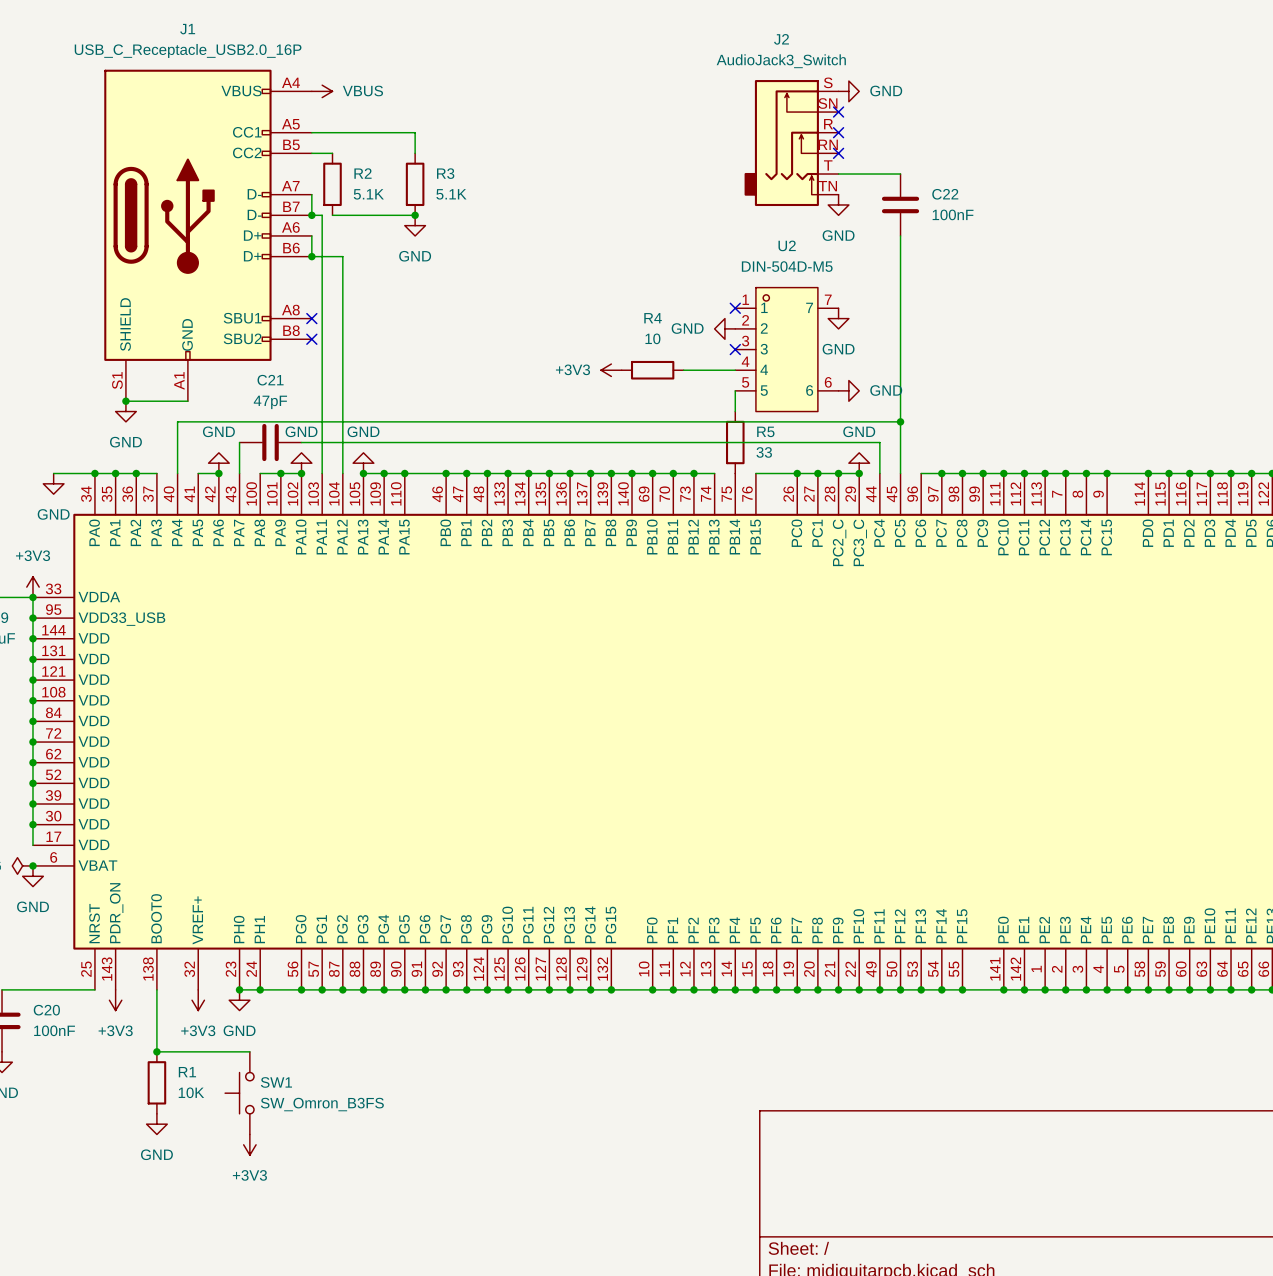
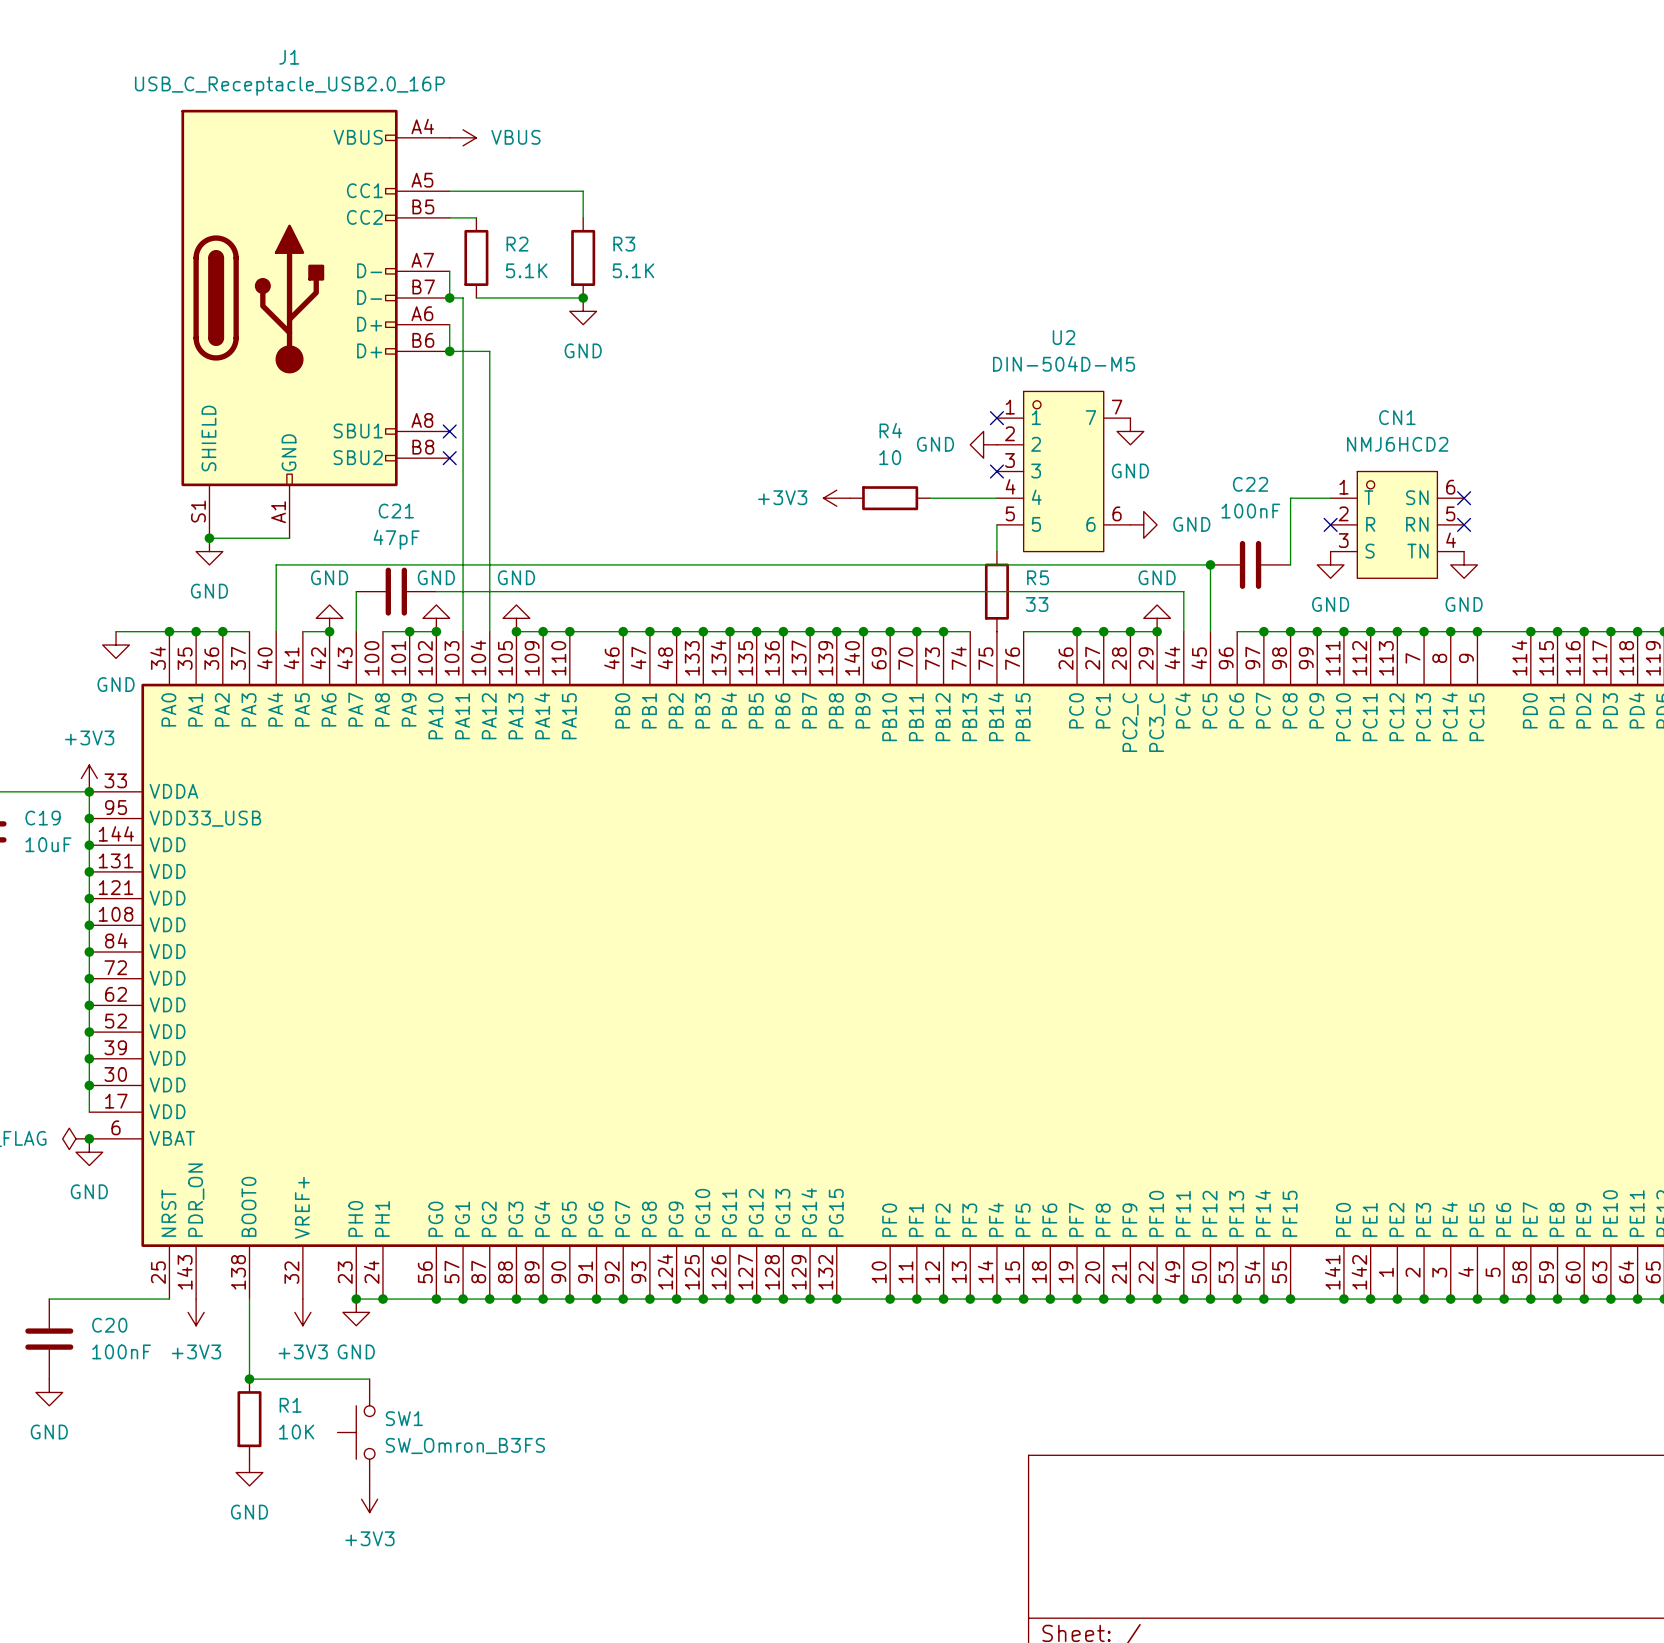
power symbol: GND (848, 91) -> none
no-connect mark: (838, 112) -> none
no-connect mark: (838, 132) -> none
J2: AudioJack3_Switch (791, 143) -> none
no-connect mark: (838, 153) -> none
wire: (838, 174) (900, 174) -> none
C22 name position: C22 (945, 194) -> C22 (1250, 484)
power symbol: GND (838, 204) -> none
C22 rotation: 0° (900, 204) -> 90° clockwise (1250, 564)
C22 position: (900, 204) -> (1250, 564)
C22 value position: 100nF (953, 214) -> 100nF (1250, 511)
wire: (900, 235) (900, 421) -> none
wire: none -> (1330, 498) (1290, 498) (1290, 564)
no-connect mark: none -> (1464, 498)
no-connect mark: none -> (1330, 524)
CN1: none -> NMJ6HCD2 (1397, 524)
no-connect mark: none -> (1464, 524)
power symbol: none -> GND (1330, 564)
power symbol: none -> GND (1464, 564)

